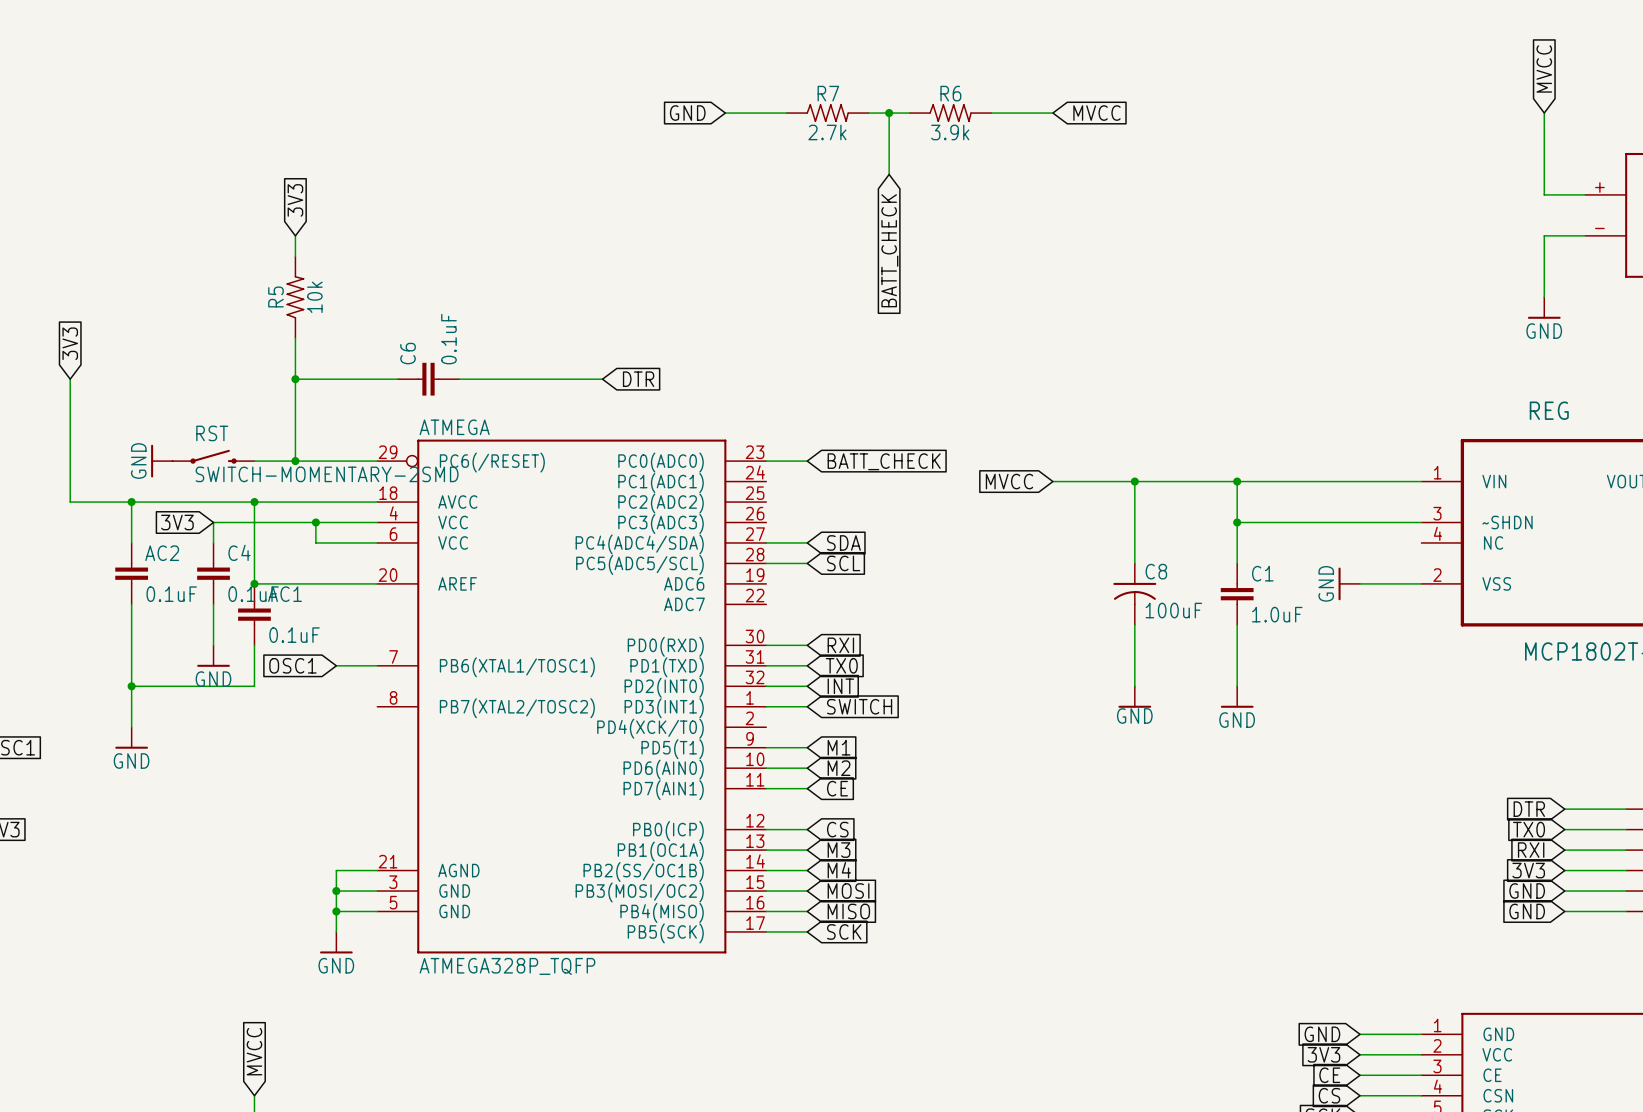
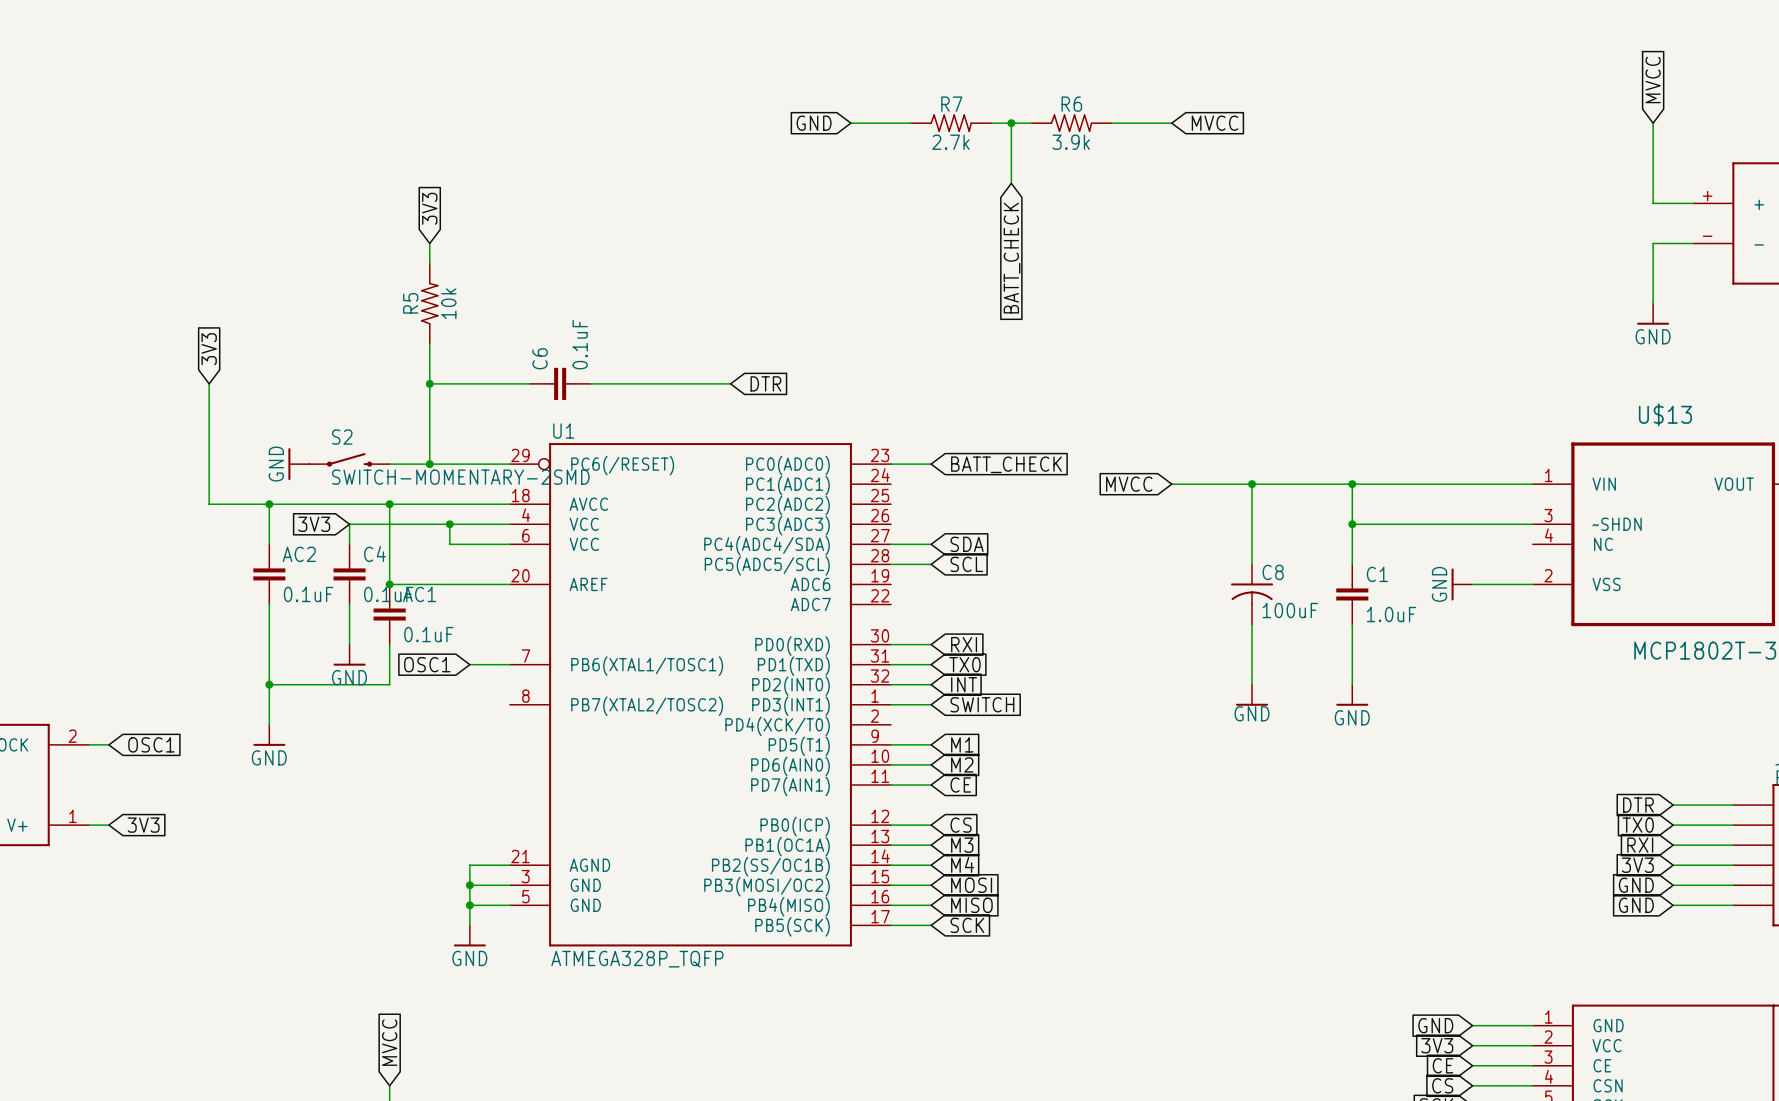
REG name: REG (1549, 410) -> U$13 (1665, 414)
ATMEGA name: ATMEGA (454, 427) -> U1 (563, 431)
RST name: RST (212, 433) -> S2 (342, 437)

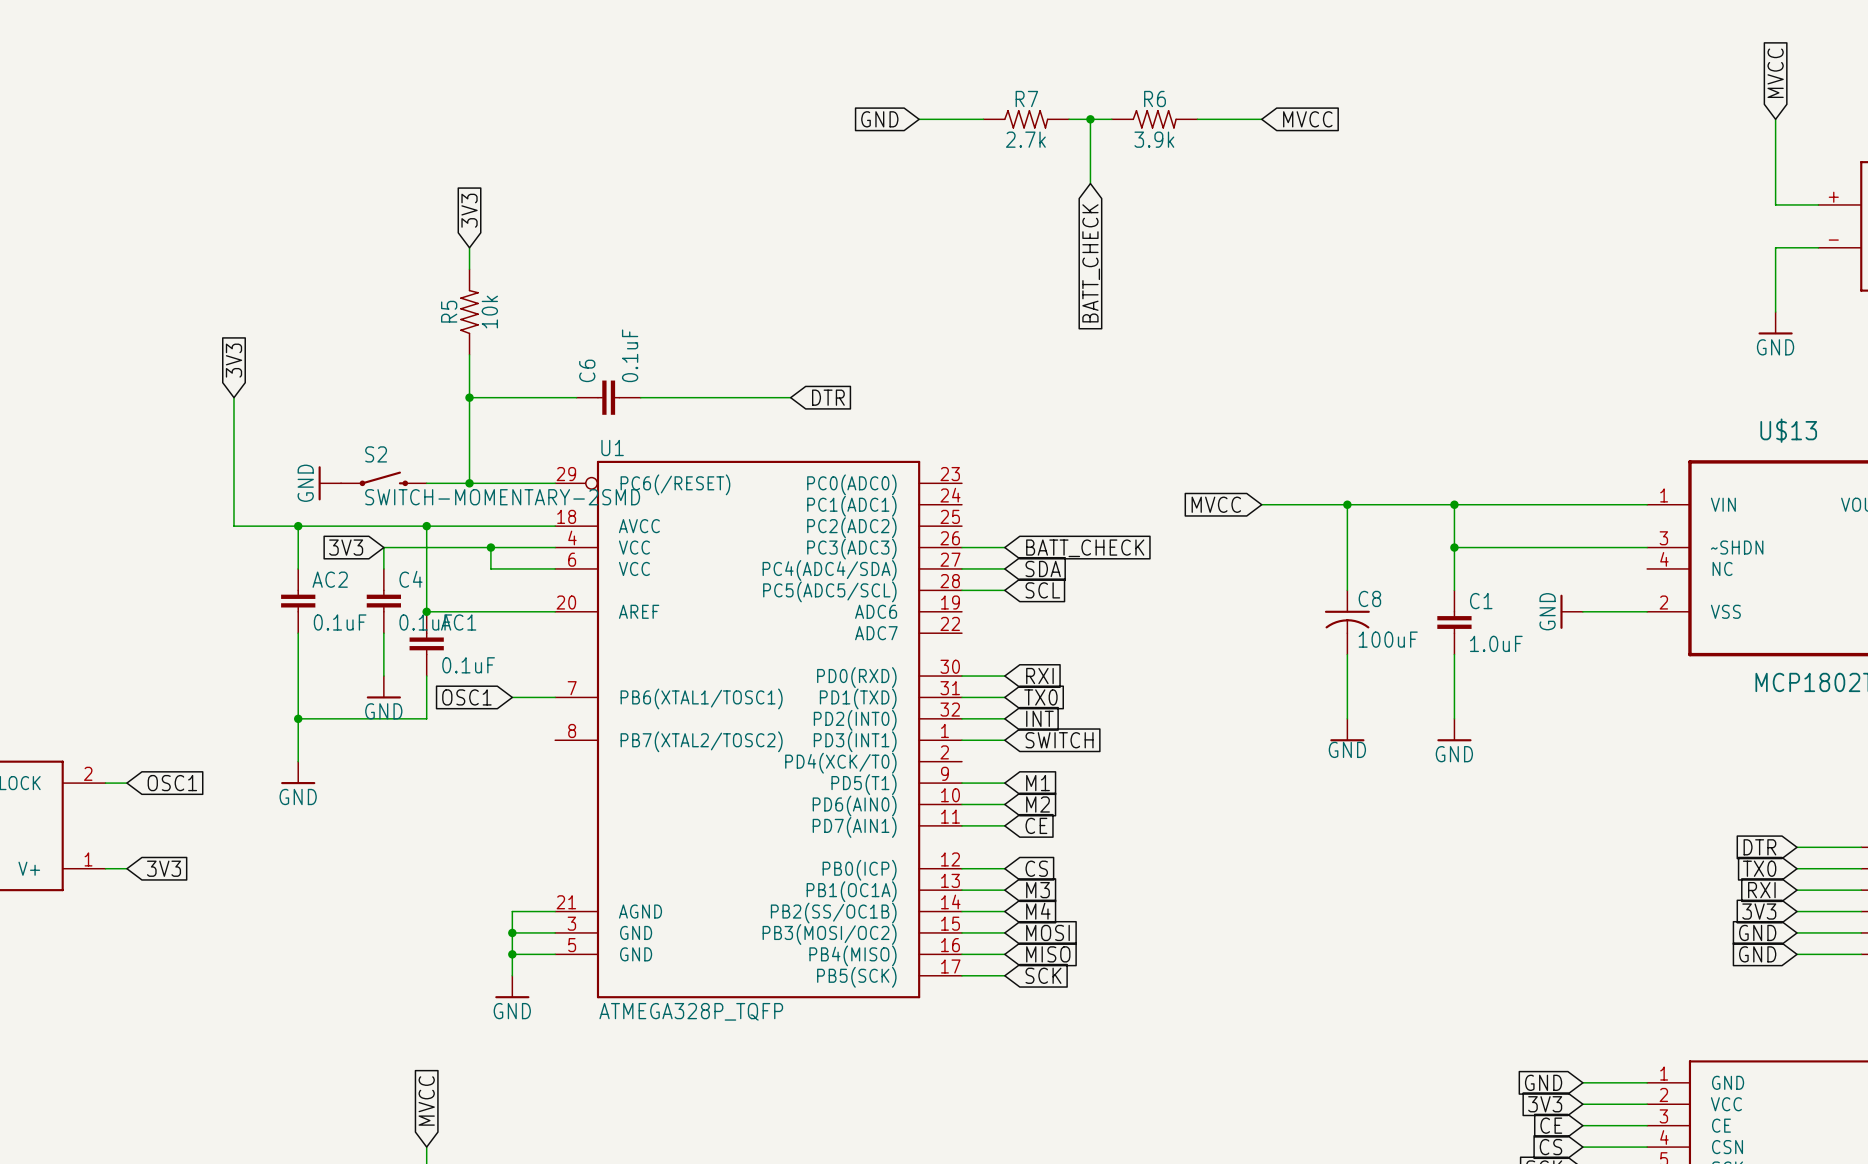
wire: (891, 464) (931, 464) -> (961, 547) (1004, 547)
global label position: BATT_CHECK (1006, 464) -> BATT_CHECK (1085, 548)

